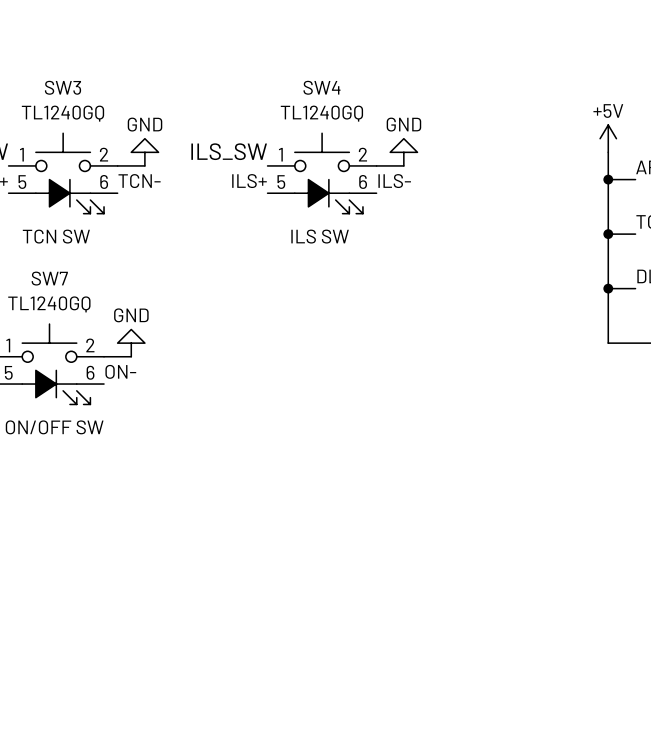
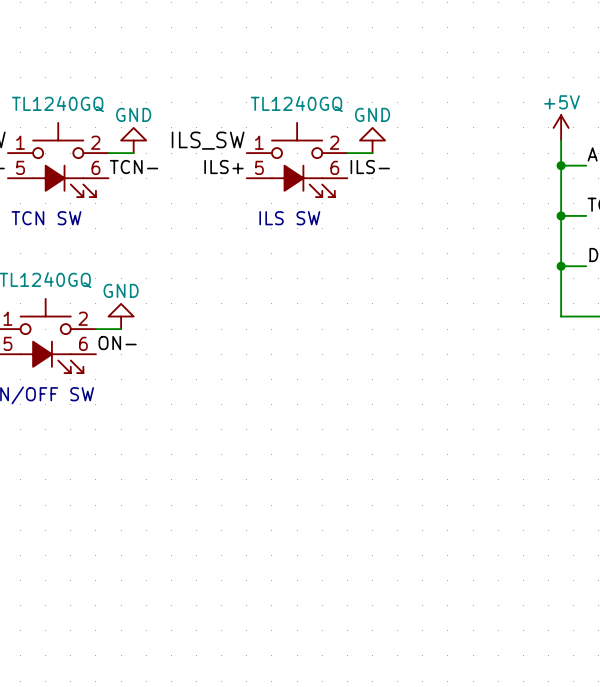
SW3 name: SW3 (63, 87) -> none
SW4 name: SW4 (321, 87) -> none
SW7 name: SW7 (49, 278) -> none

